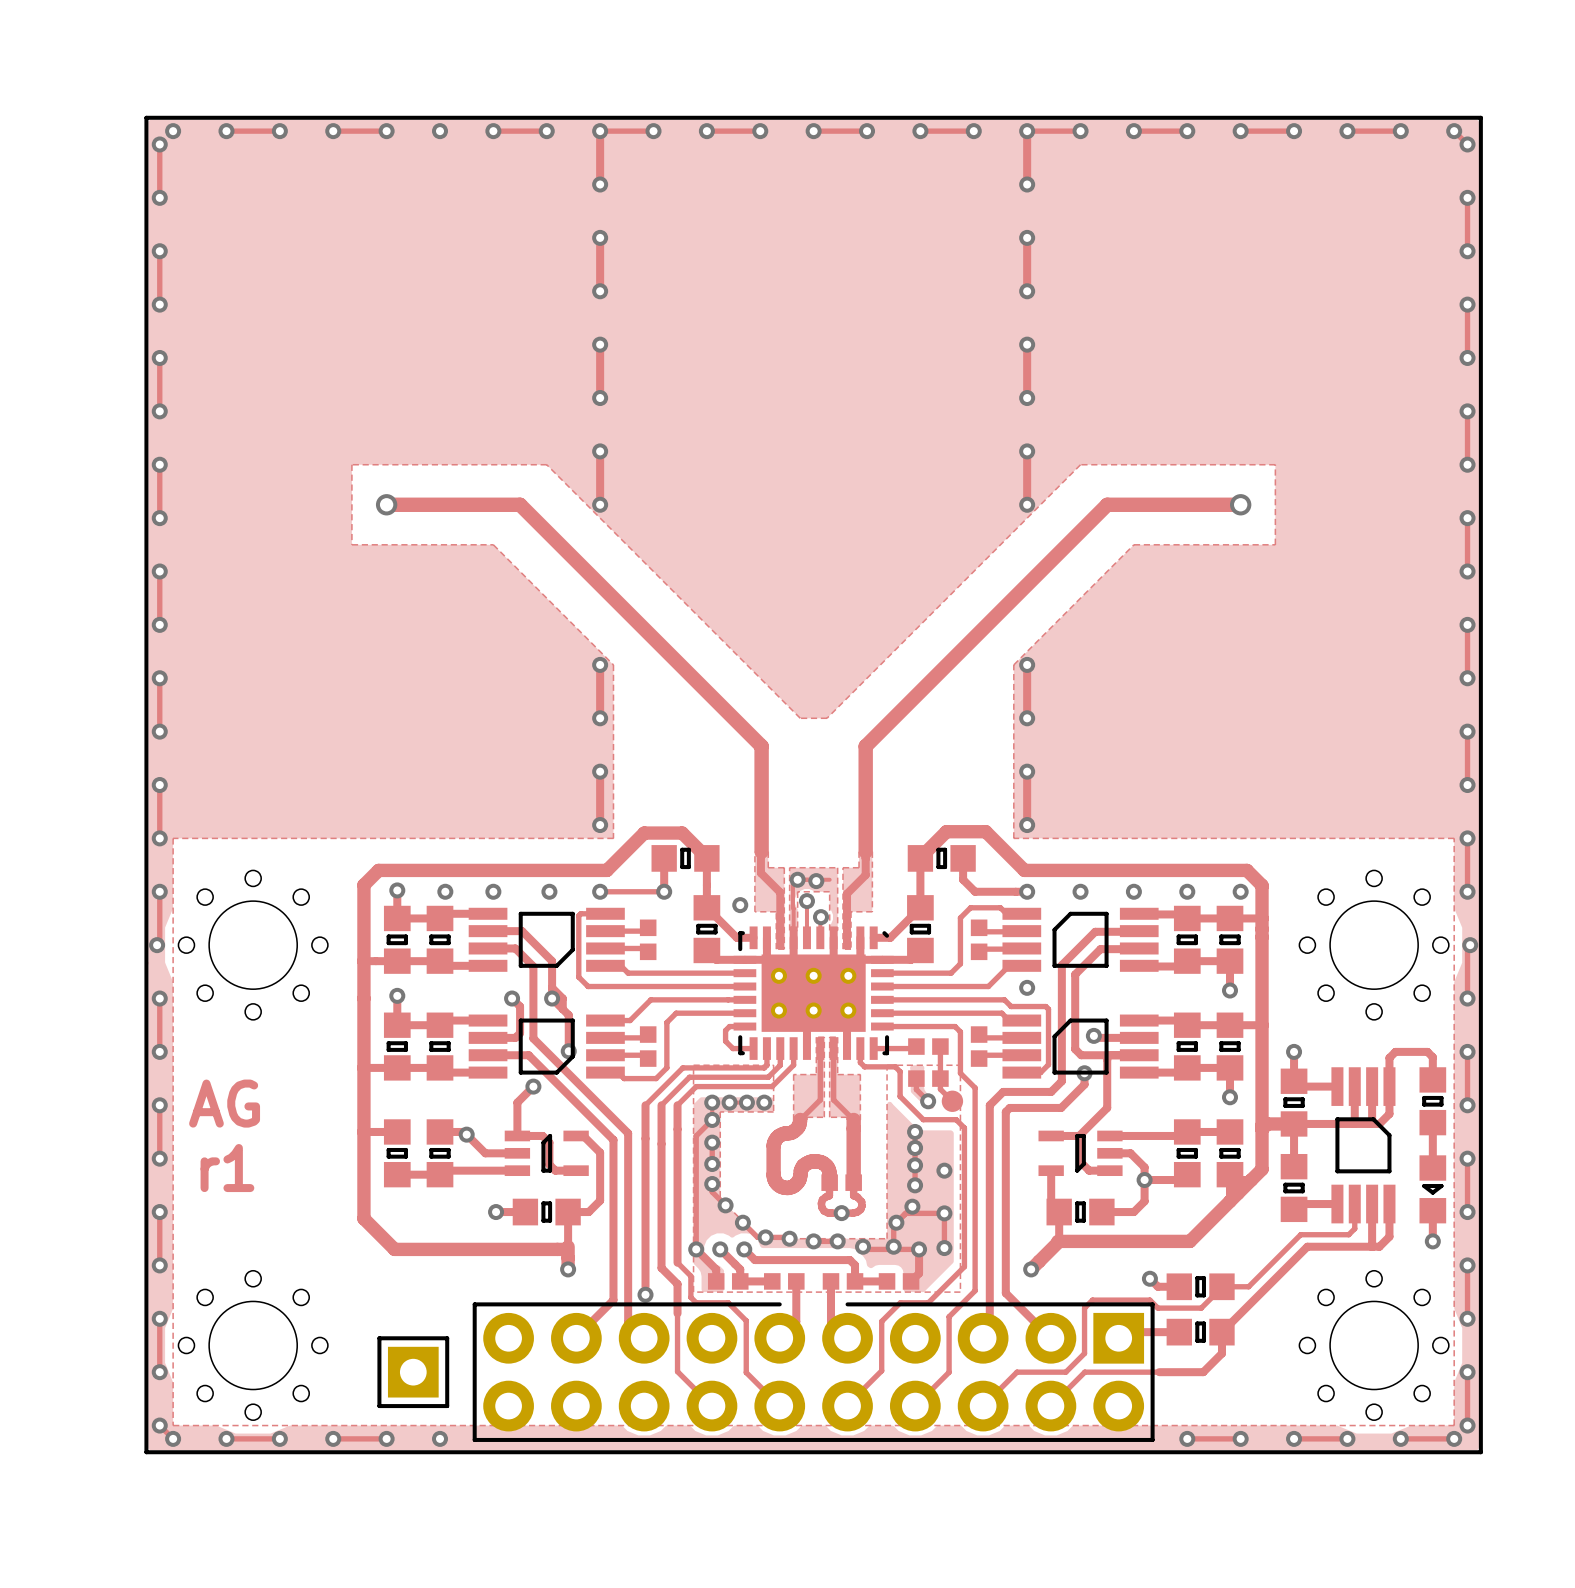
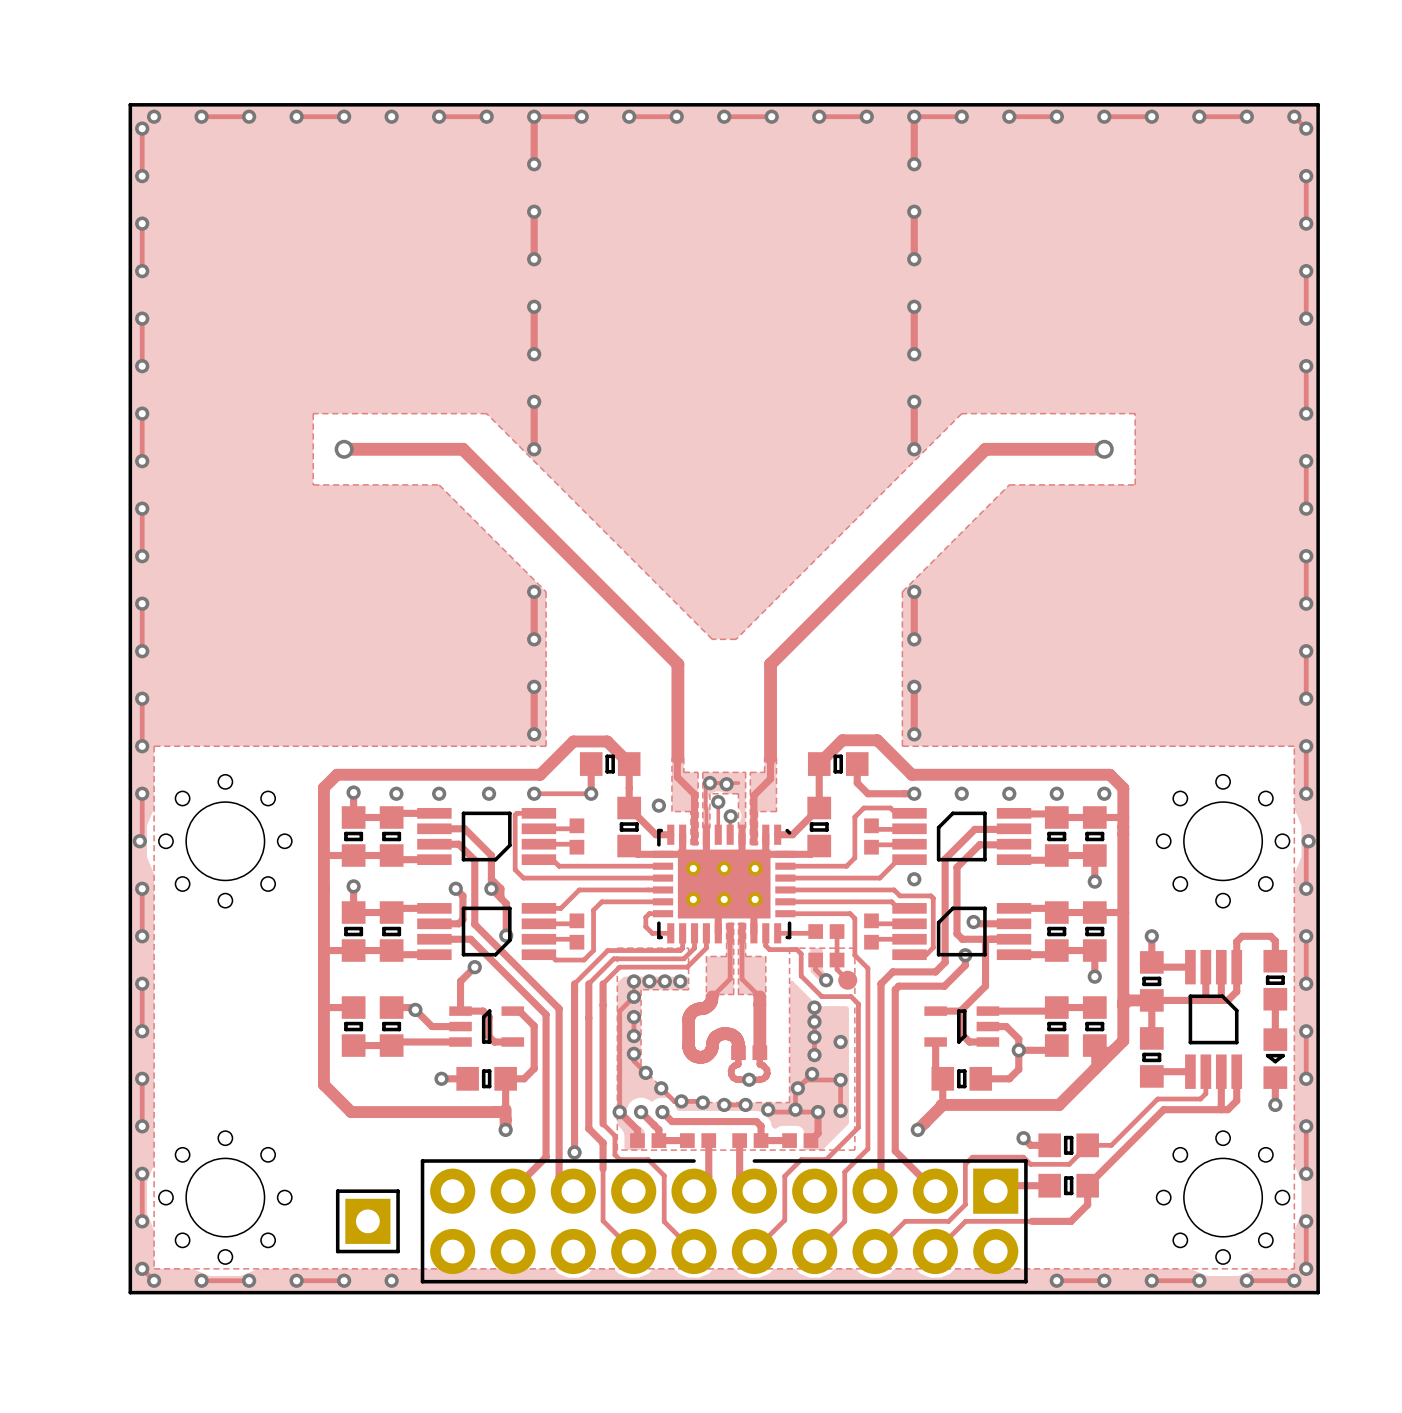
text: AG (224, 1103) -> none
text: r1 (227, 1168) -> none

